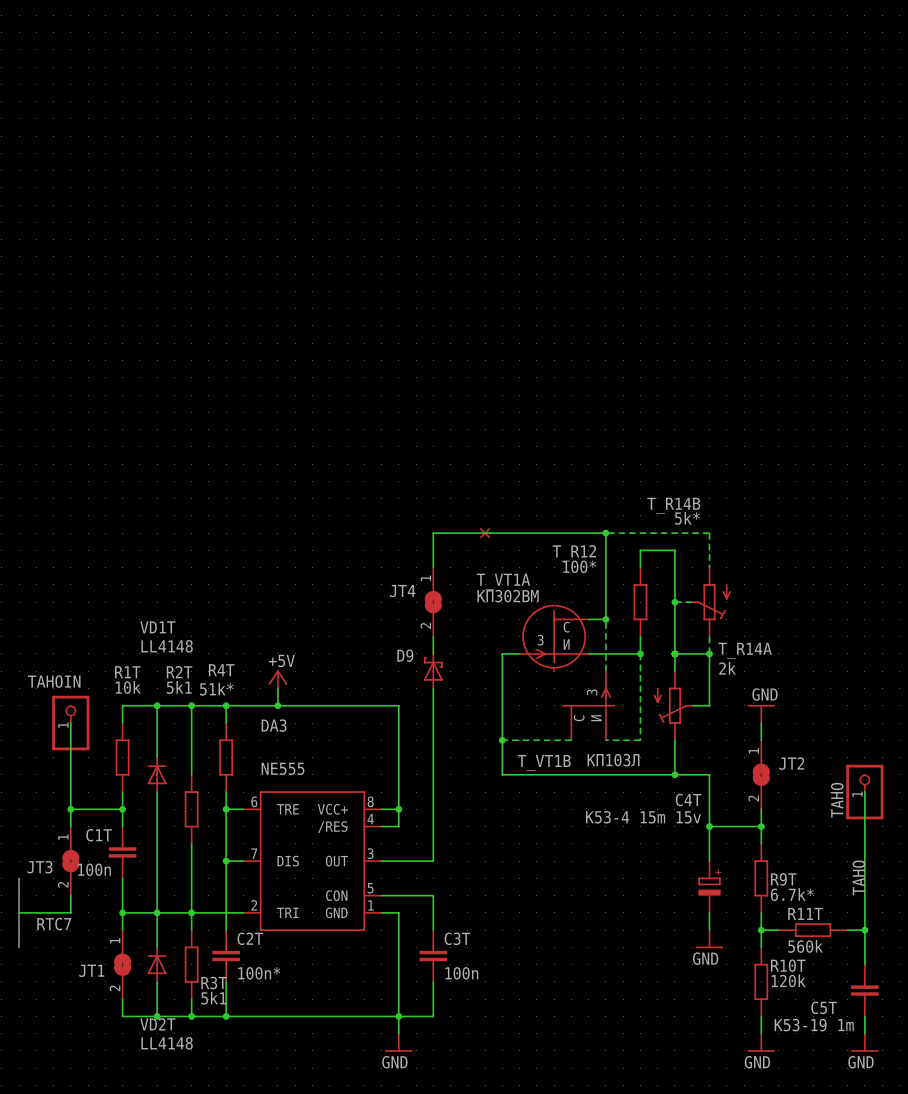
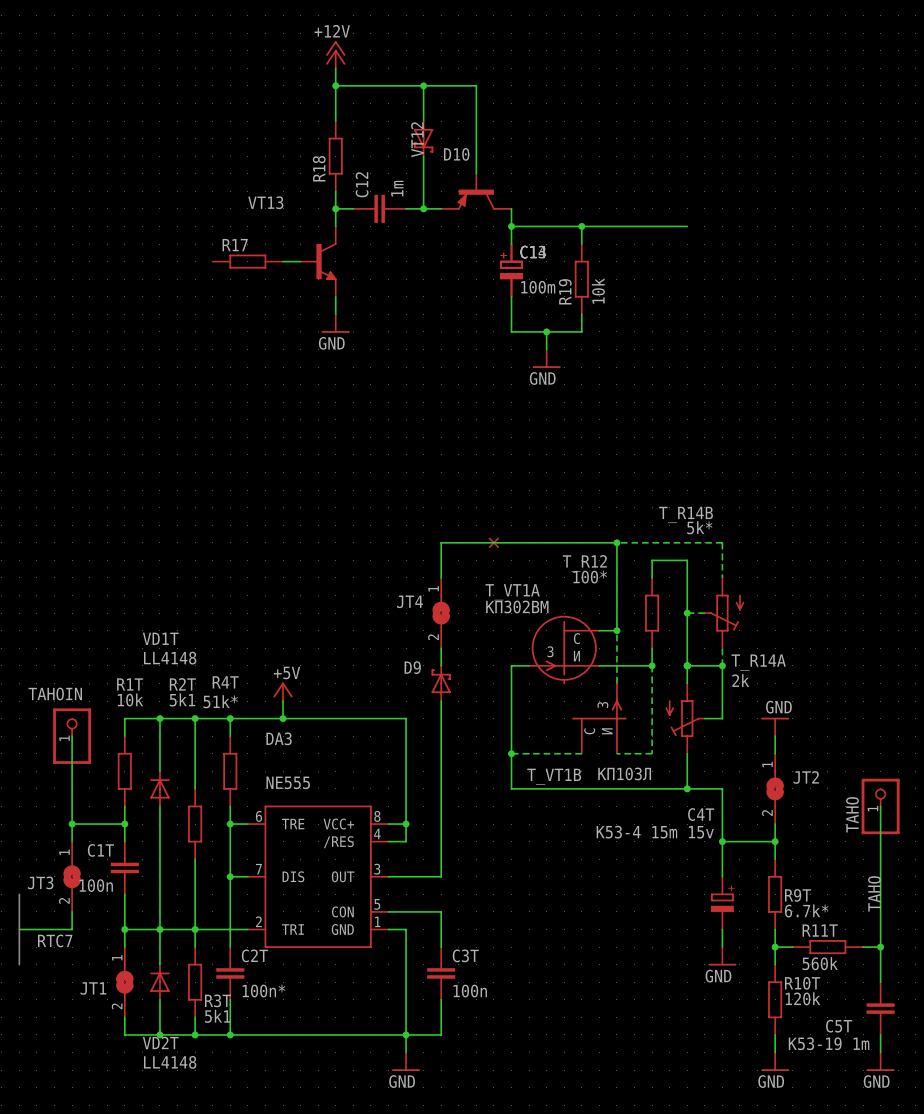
power symbol: none -> +12V (335, 54)
wire: none -> (335, 68) (335, 121)
wire: none -> (335, 85) (476, 85) (476, 173)
junction: none -> (335, 85)
wire: none -> (423, 85) (423, 121)
junction: none -> (423, 85)
D10: none -> (423, 138)
R18: none -> (335, 156)
wire: none -> (423, 156) (423, 208)
wire: none -> (335, 191) (335, 226)
VT12: none -> (476, 191)
wire: none -> (335, 208) (353, 208)
junction: none -> (335, 208)
C12: none -> 1m (379, 208)
wire: none -> (406, 208) (441, 208)
junction: none -> (423, 208)
wire: none -> (511, 208) (511, 244)
wire: none -> (511, 226) (687, 226)
junction: none -> (511, 226)
wire: none -> (581, 226) (581, 244)
junction: none -> (581, 226)
R17: none -> (247, 261)
wire: none -> (283, 261) (300, 261)
VT13: none -> (318, 261)
part: none -> (511, 270)
part: none -> 100m (511, 270)
R19: none -> 10k (581, 279)
wire: none -> (335, 296) (335, 314)
wire: none -> (511, 296) (511, 331) (581, 331) (581, 314)
power symbol: none -> GND (335, 323)
wire: none -> (546, 331) (546, 349)
junction: none -> (546, 331)
power symbol: none -> GND (546, 358)

